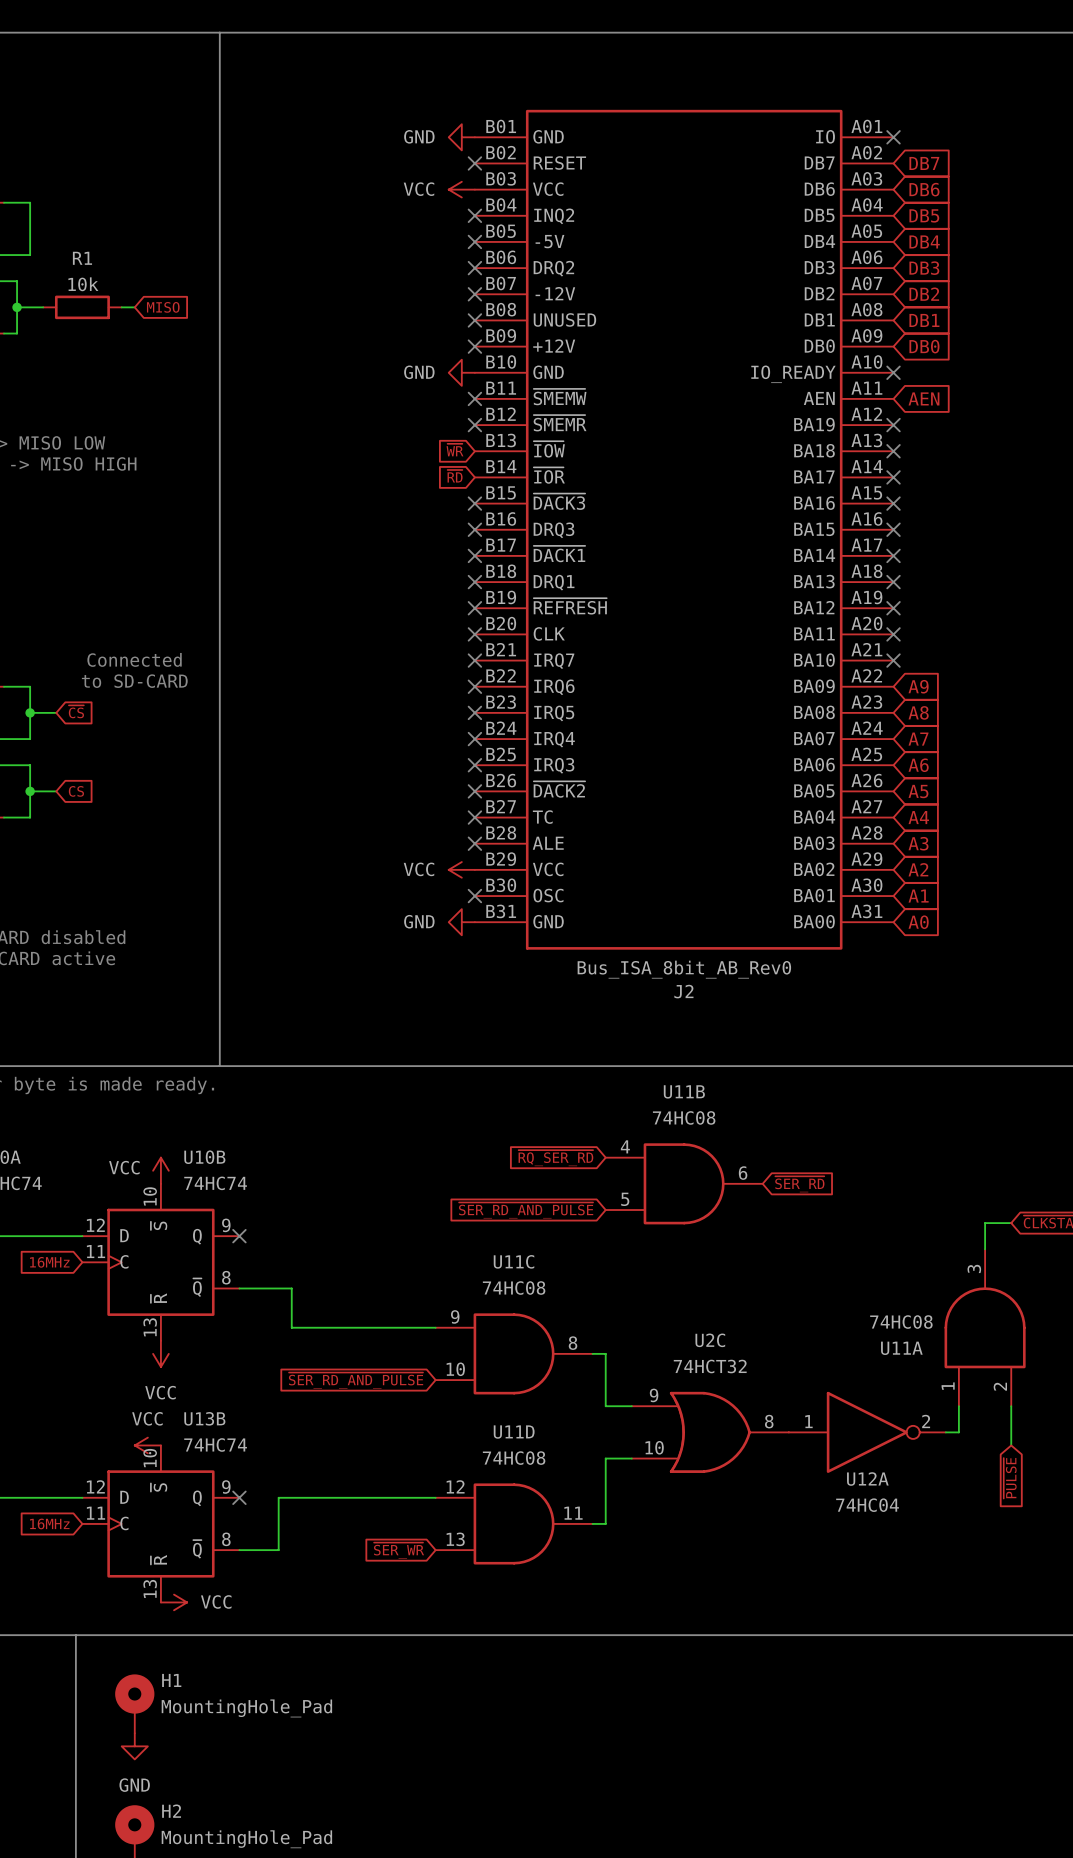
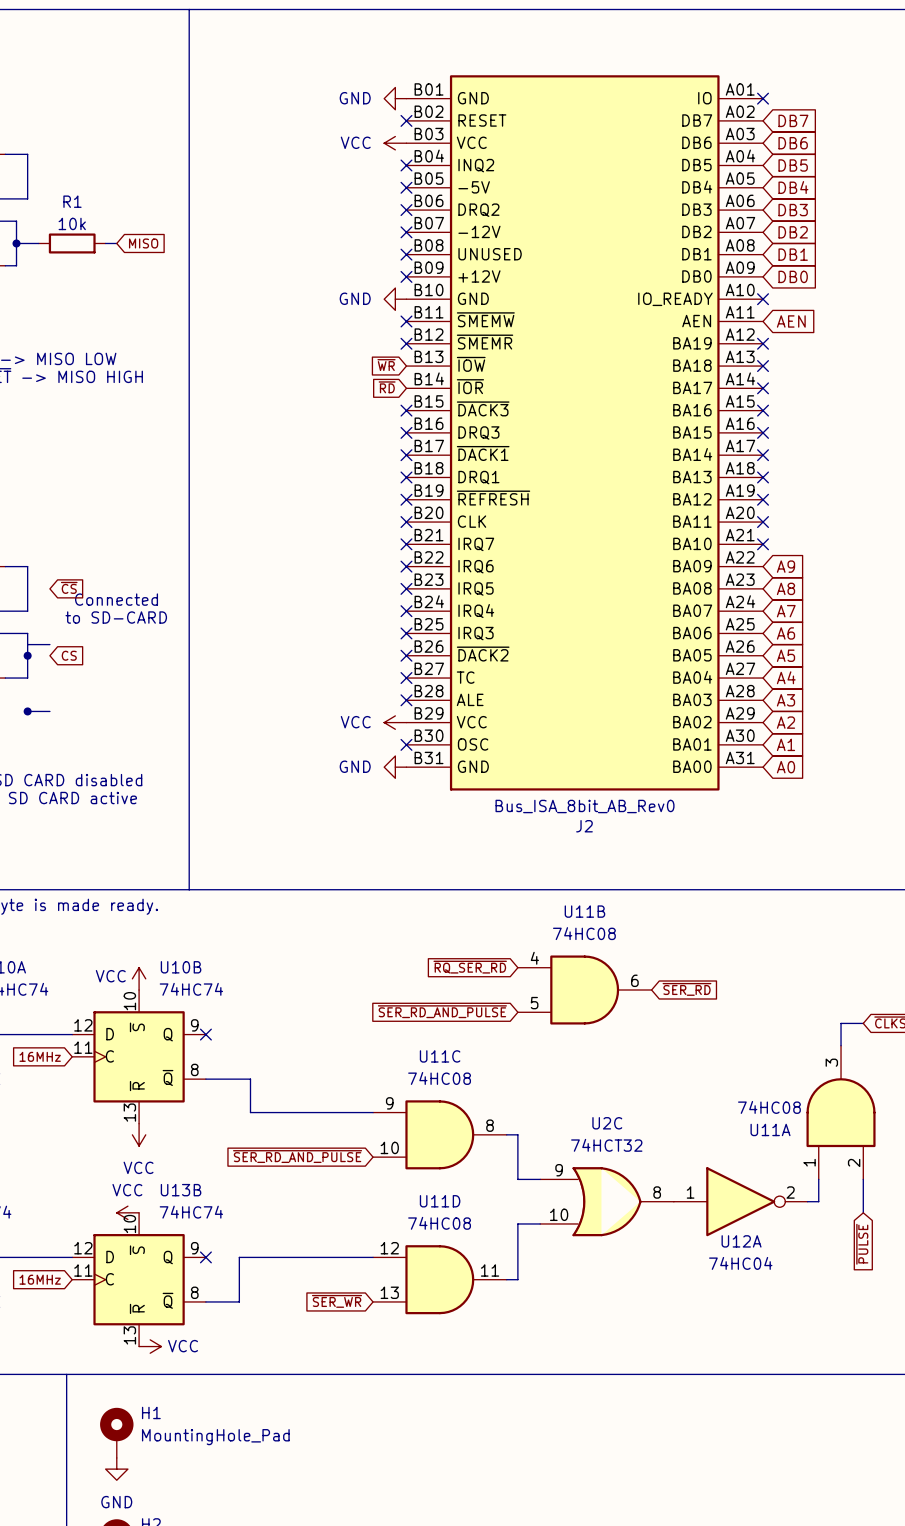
text position: Connected (134, 659) -> Connected (116, 599)
text position: to SD-CARD (134, 681) -> to SD-CARD (116, 617)
wire: (30, 712) (56, 712) -> (27, 644) (49, 644)
junction: (30, 712) -> none
wire: (30, 791) (56, 791) -> (27, 711) (49, 711)
junction: none -> (27, 711)

